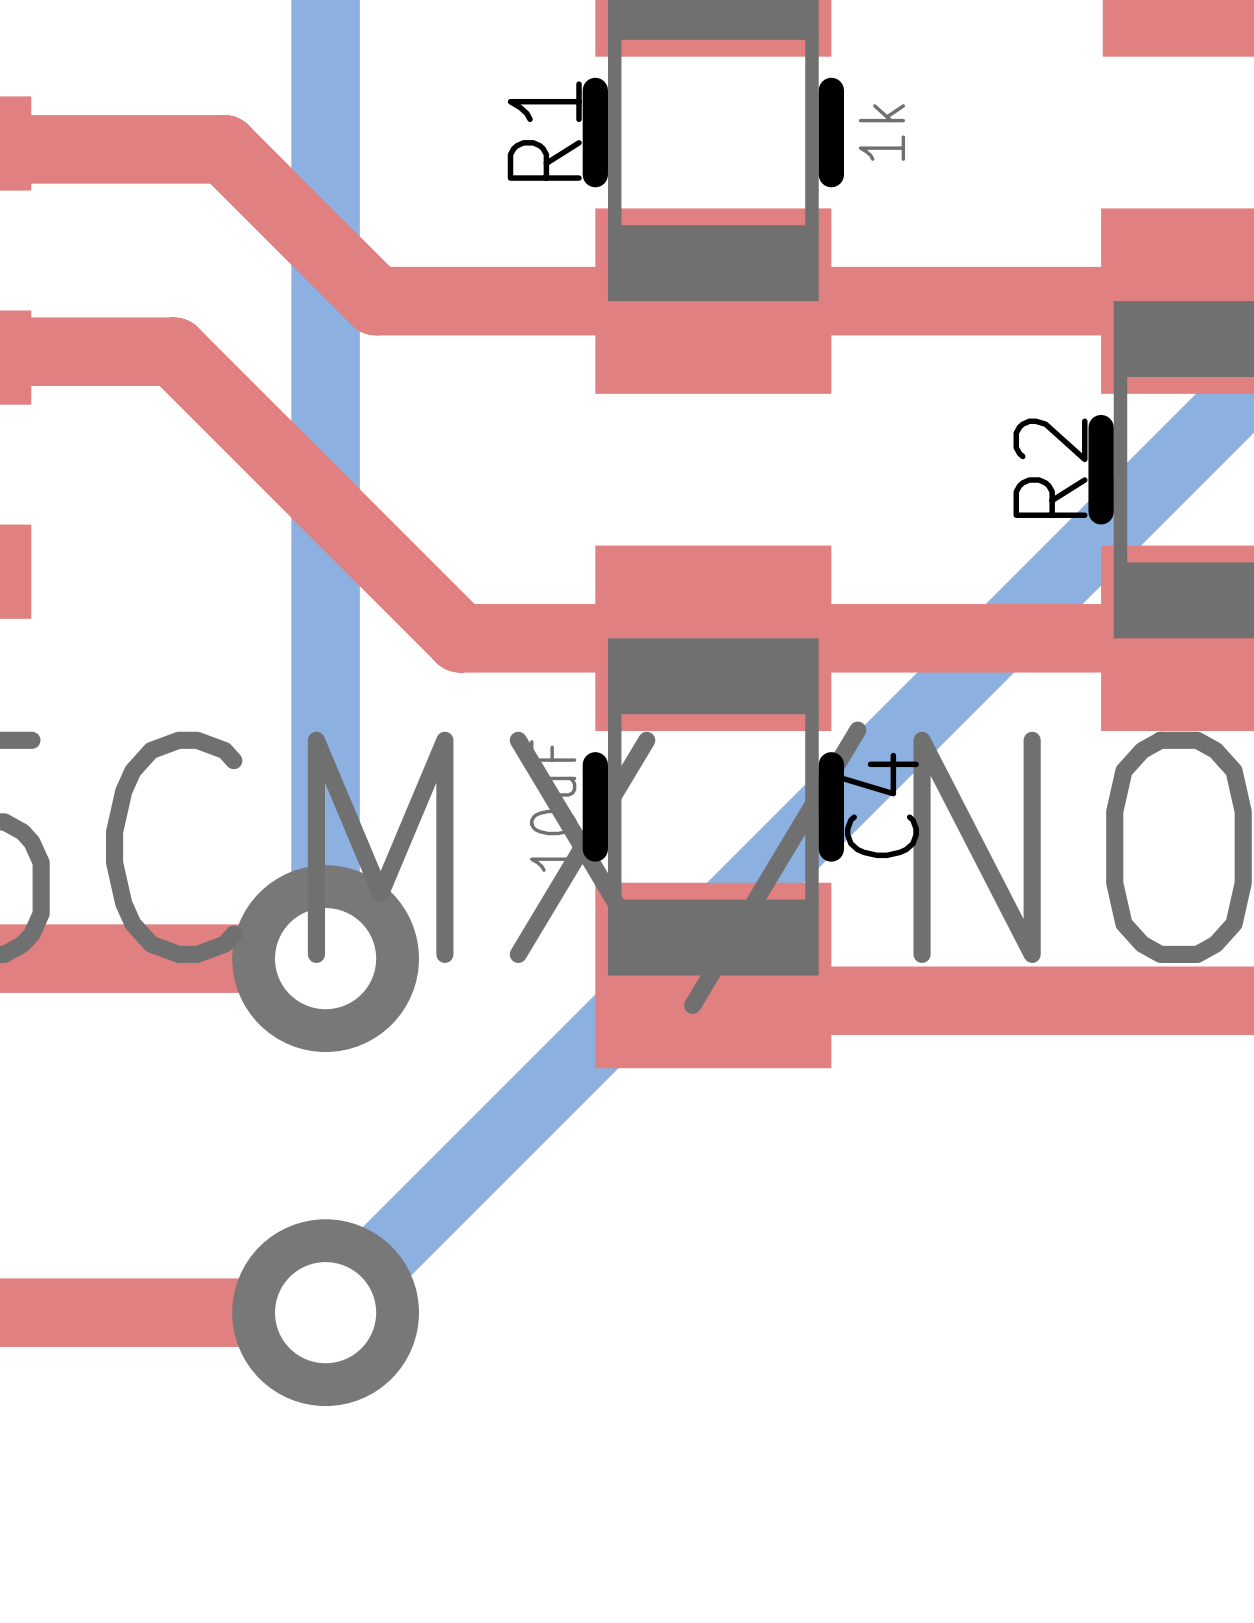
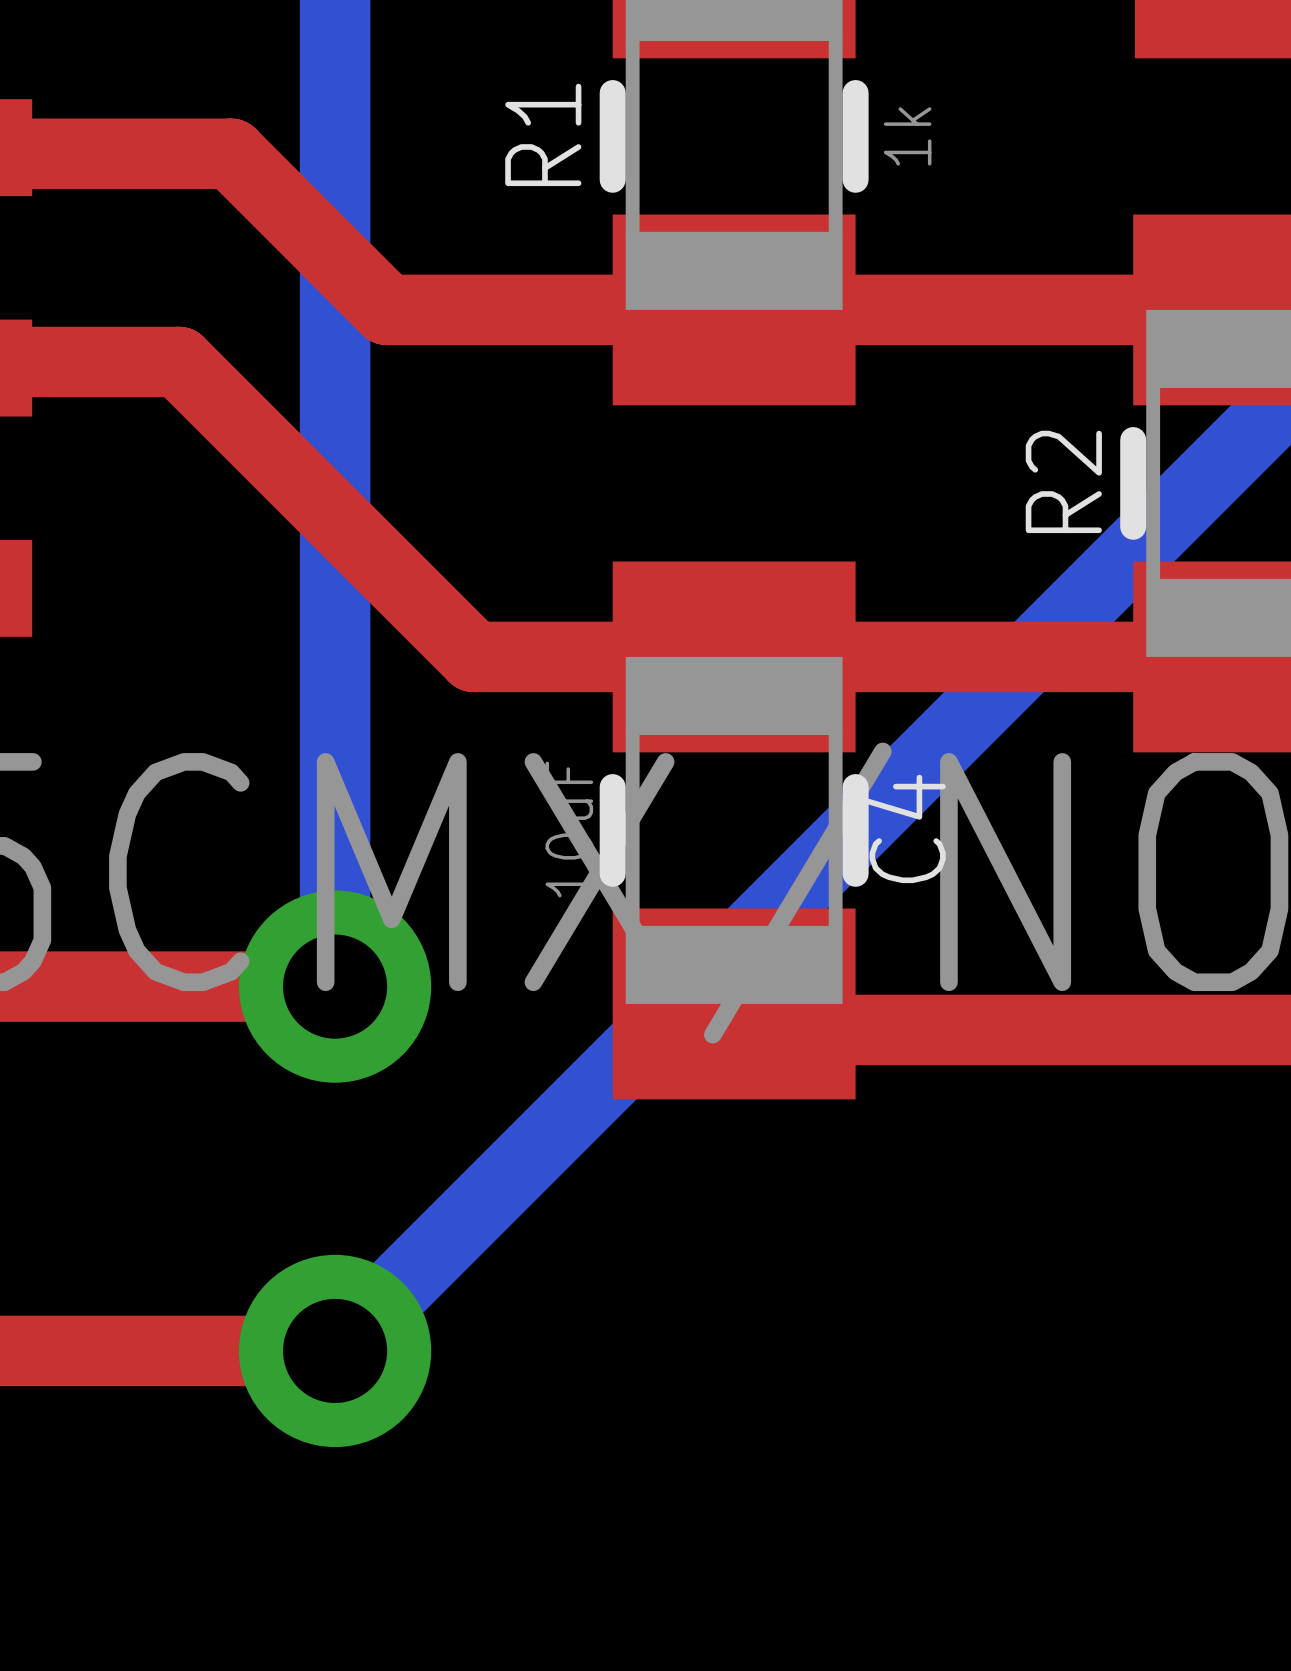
R1 name position: R1 (544, 131) -> R1 (543, 134)
R2 name position: R2 (1050, 468) -> R2 (1063, 481)

